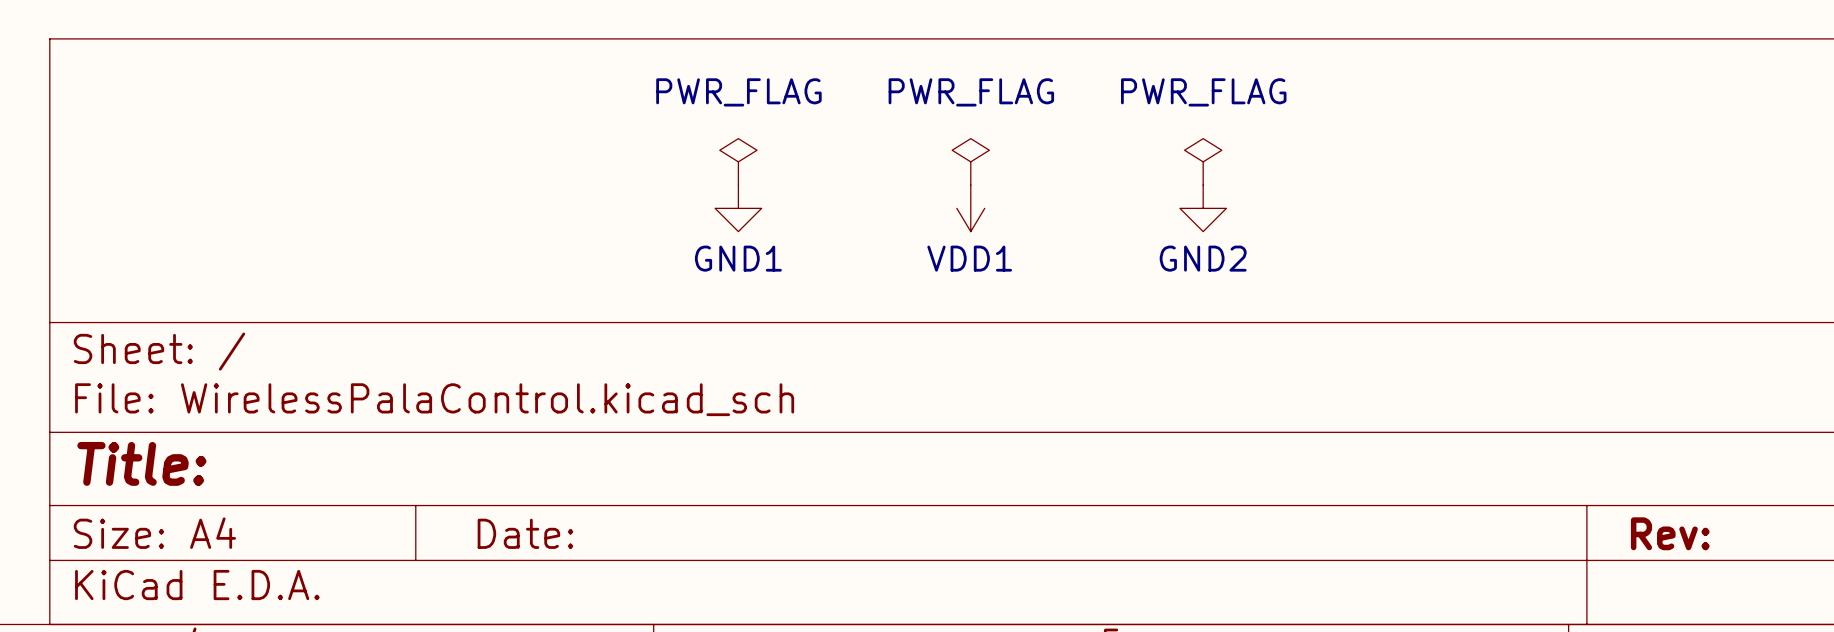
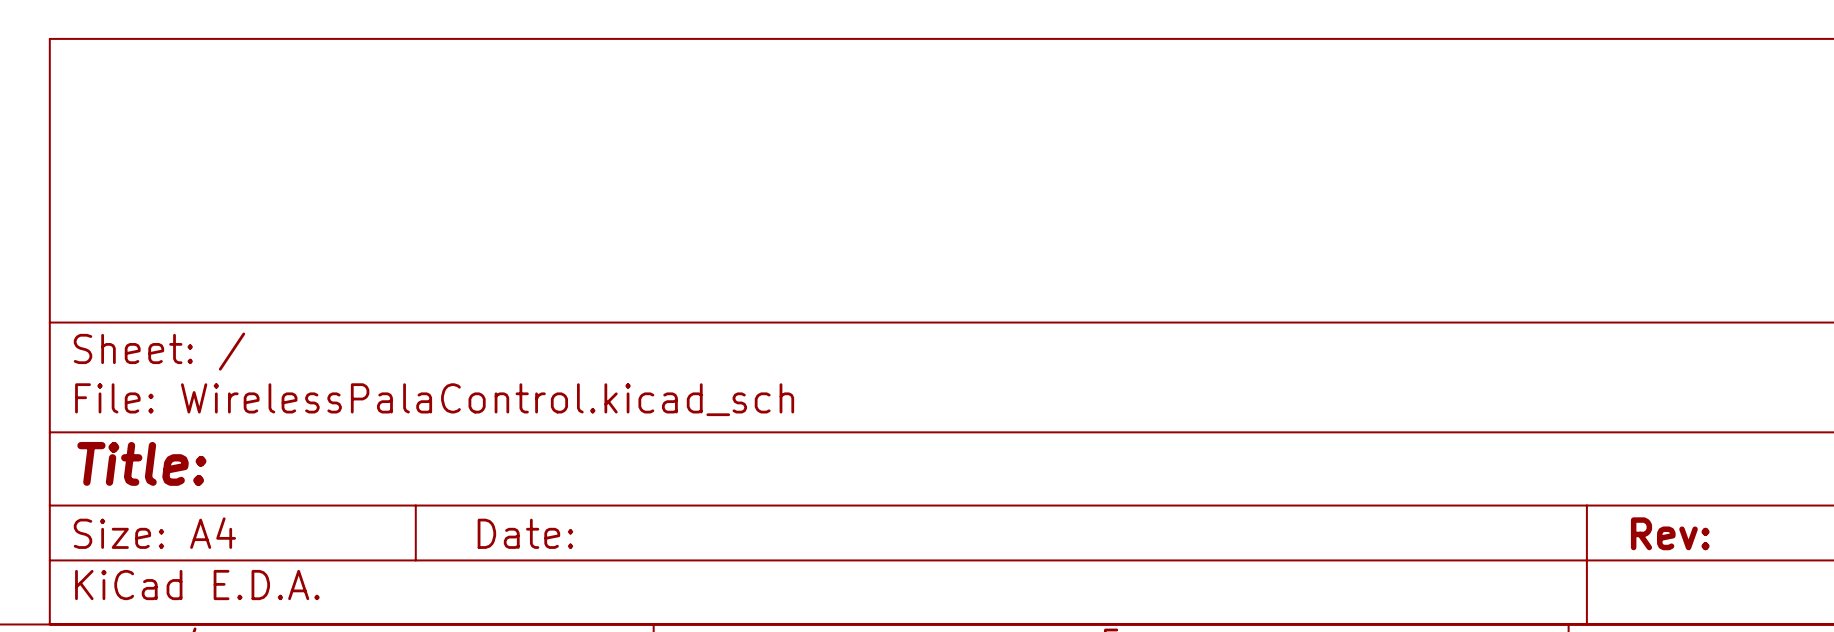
power symbol: PWR_FLAG (738, 161) -> none
power symbol: PWR_FLAG (970, 161) -> none
power symbol: PWR_FLAG (1203, 161) -> none
power symbol: GND1 (738, 208) -> none
power symbol: VDD1 (970, 208) -> none
power symbol: GND2 (1203, 208) -> none

